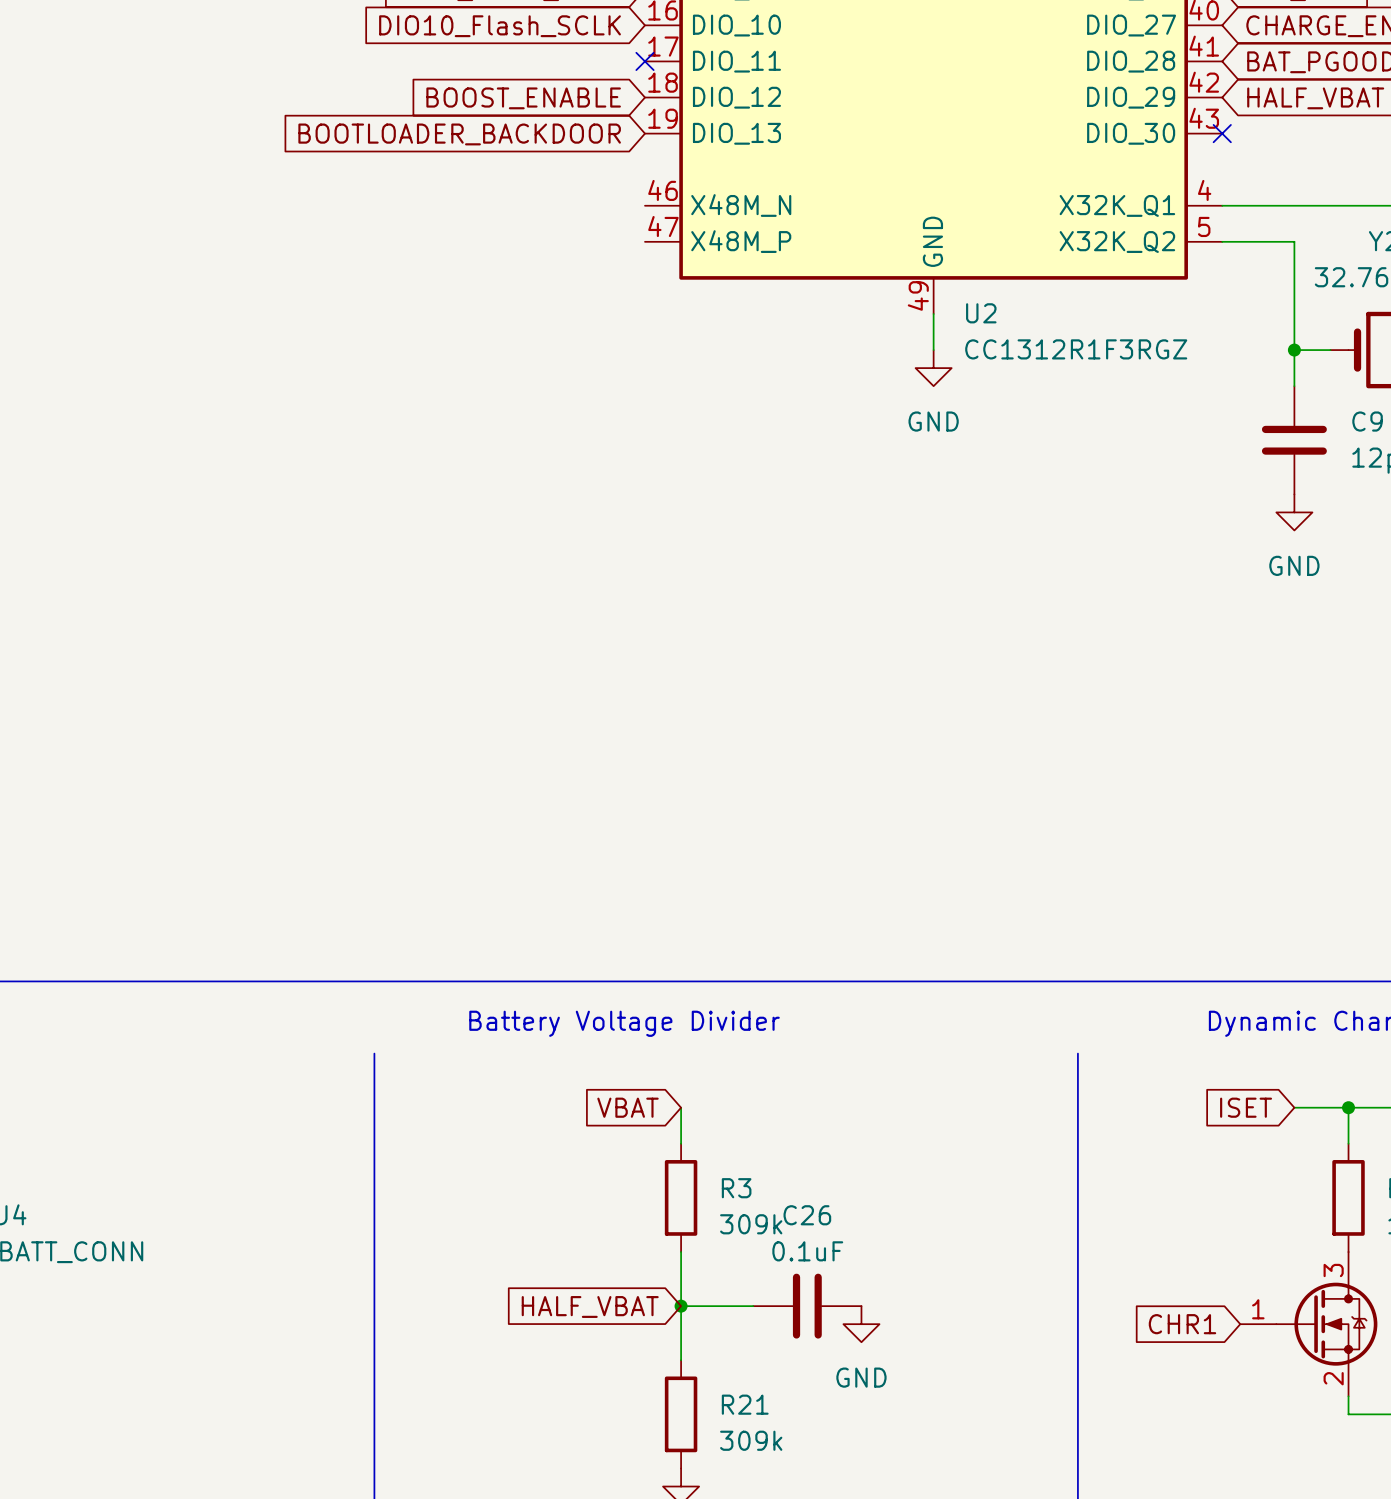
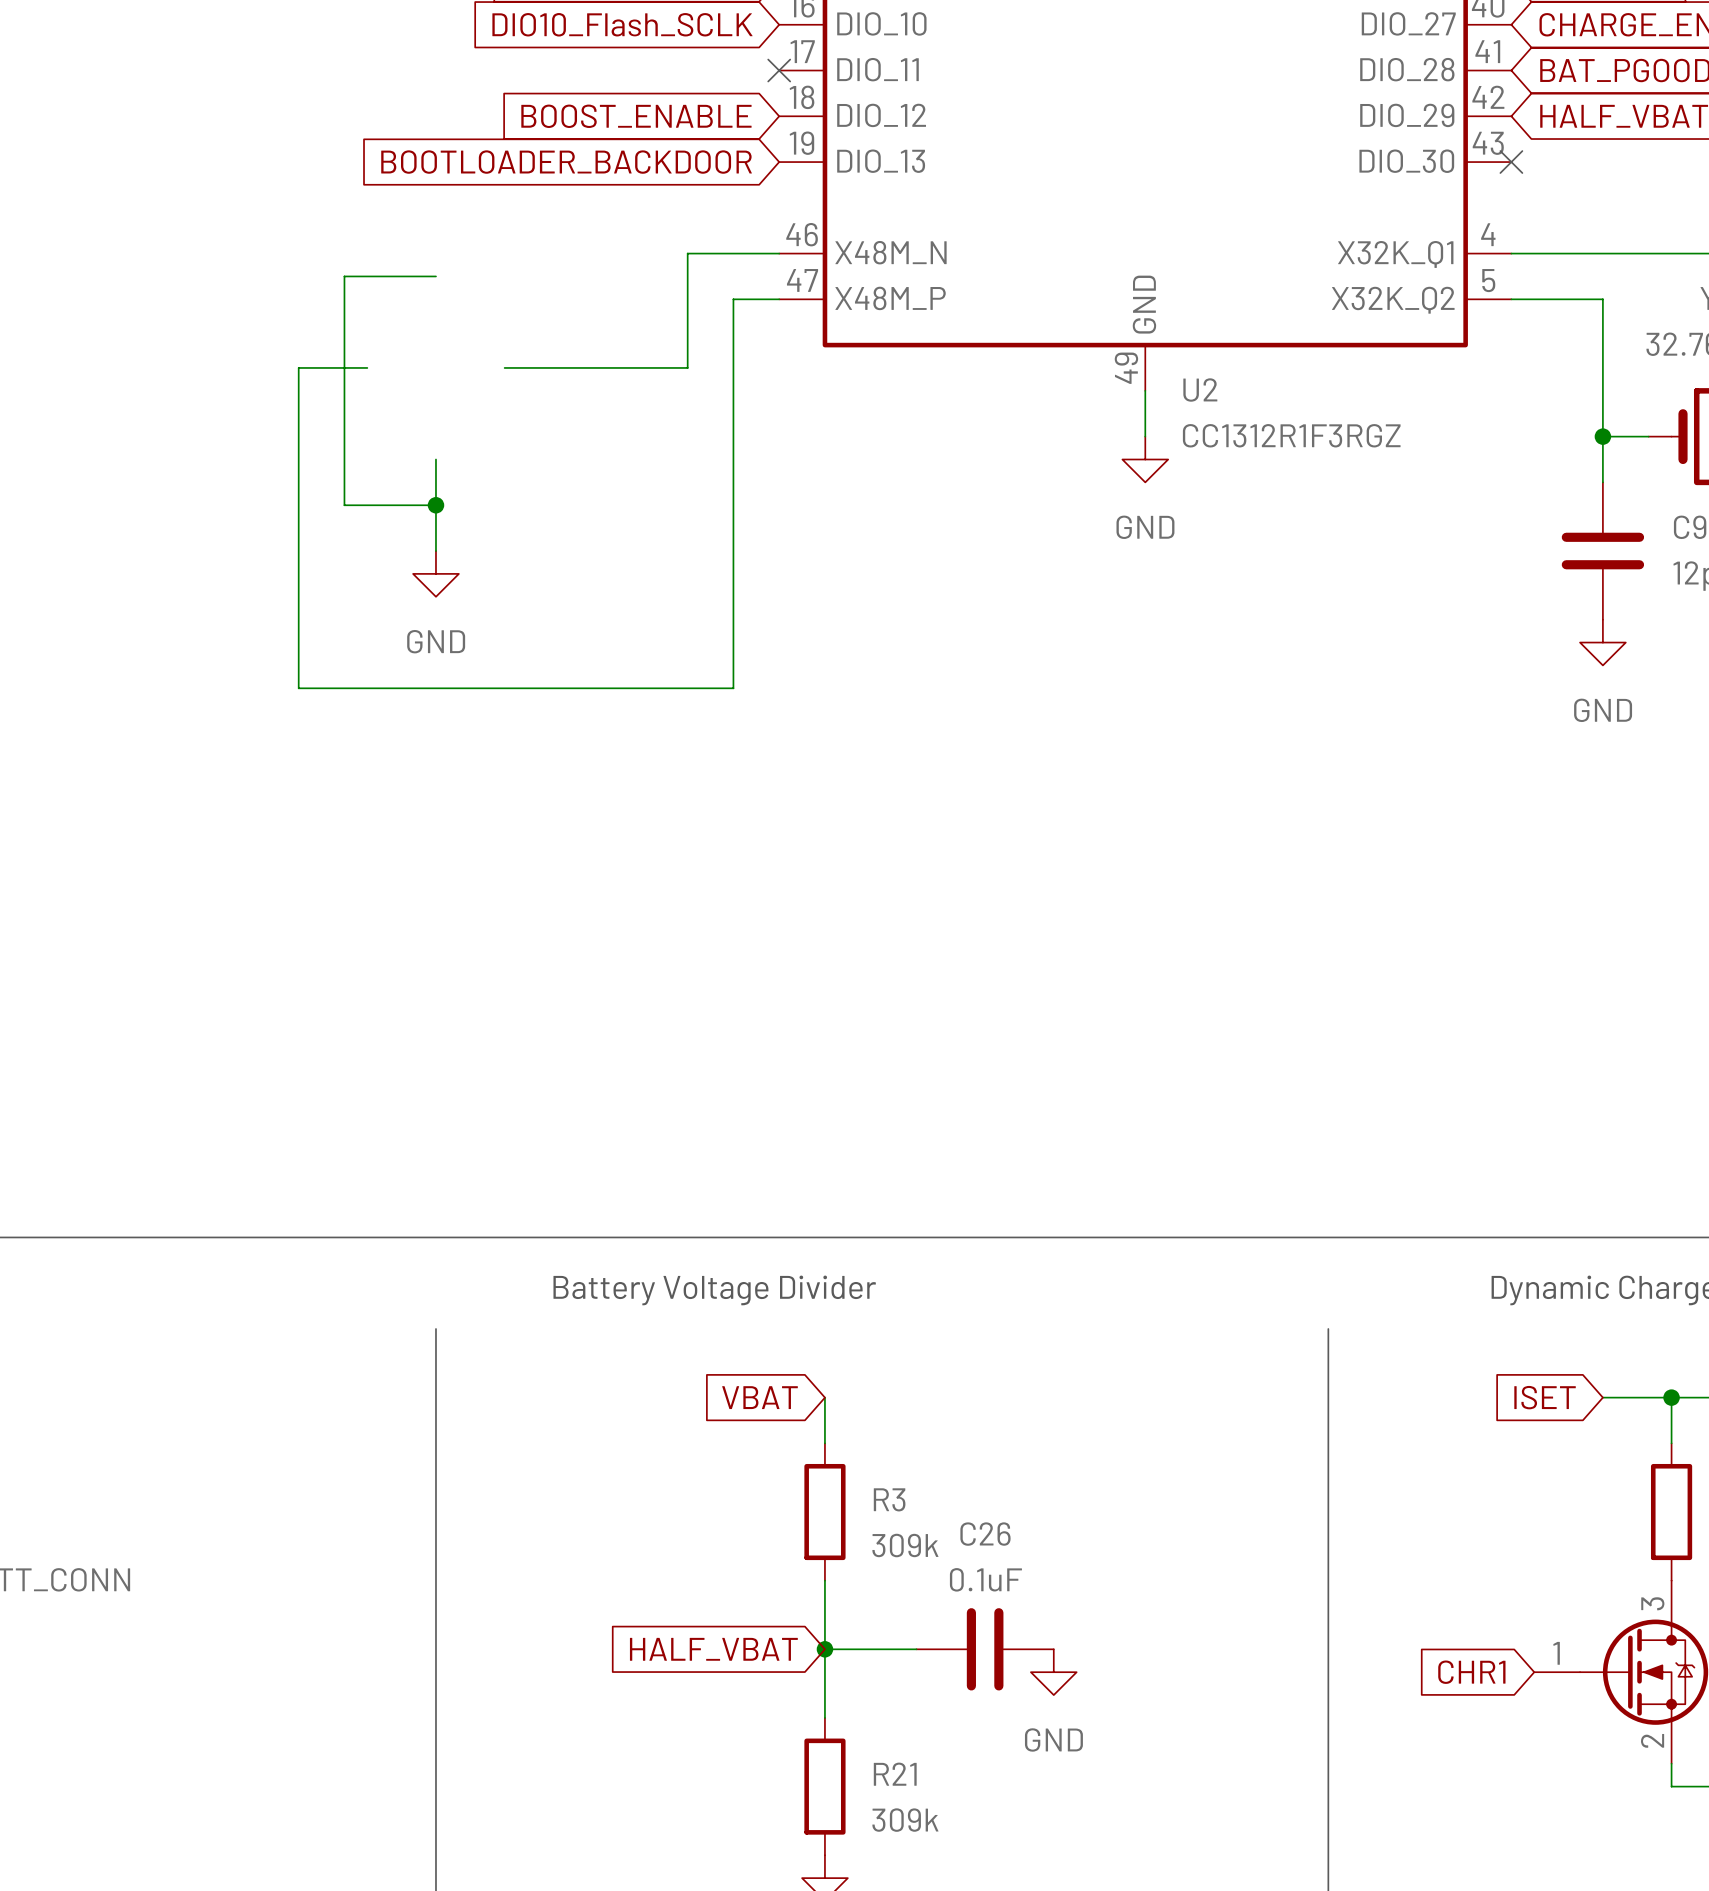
wire: none -> (779, 253) (687, 253) (687, 367) (504, 367)
wire: none -> (435, 276) (344, 276) (344, 505) (435, 505)
wire: none -> (779, 299) (733, 299) (733, 688) (298, 688) (298, 367) (367, 367)
wire: none -> (435, 459) (435, 551)
junction: none -> (435, 505)
power symbol: none -> GND (435, 573)

